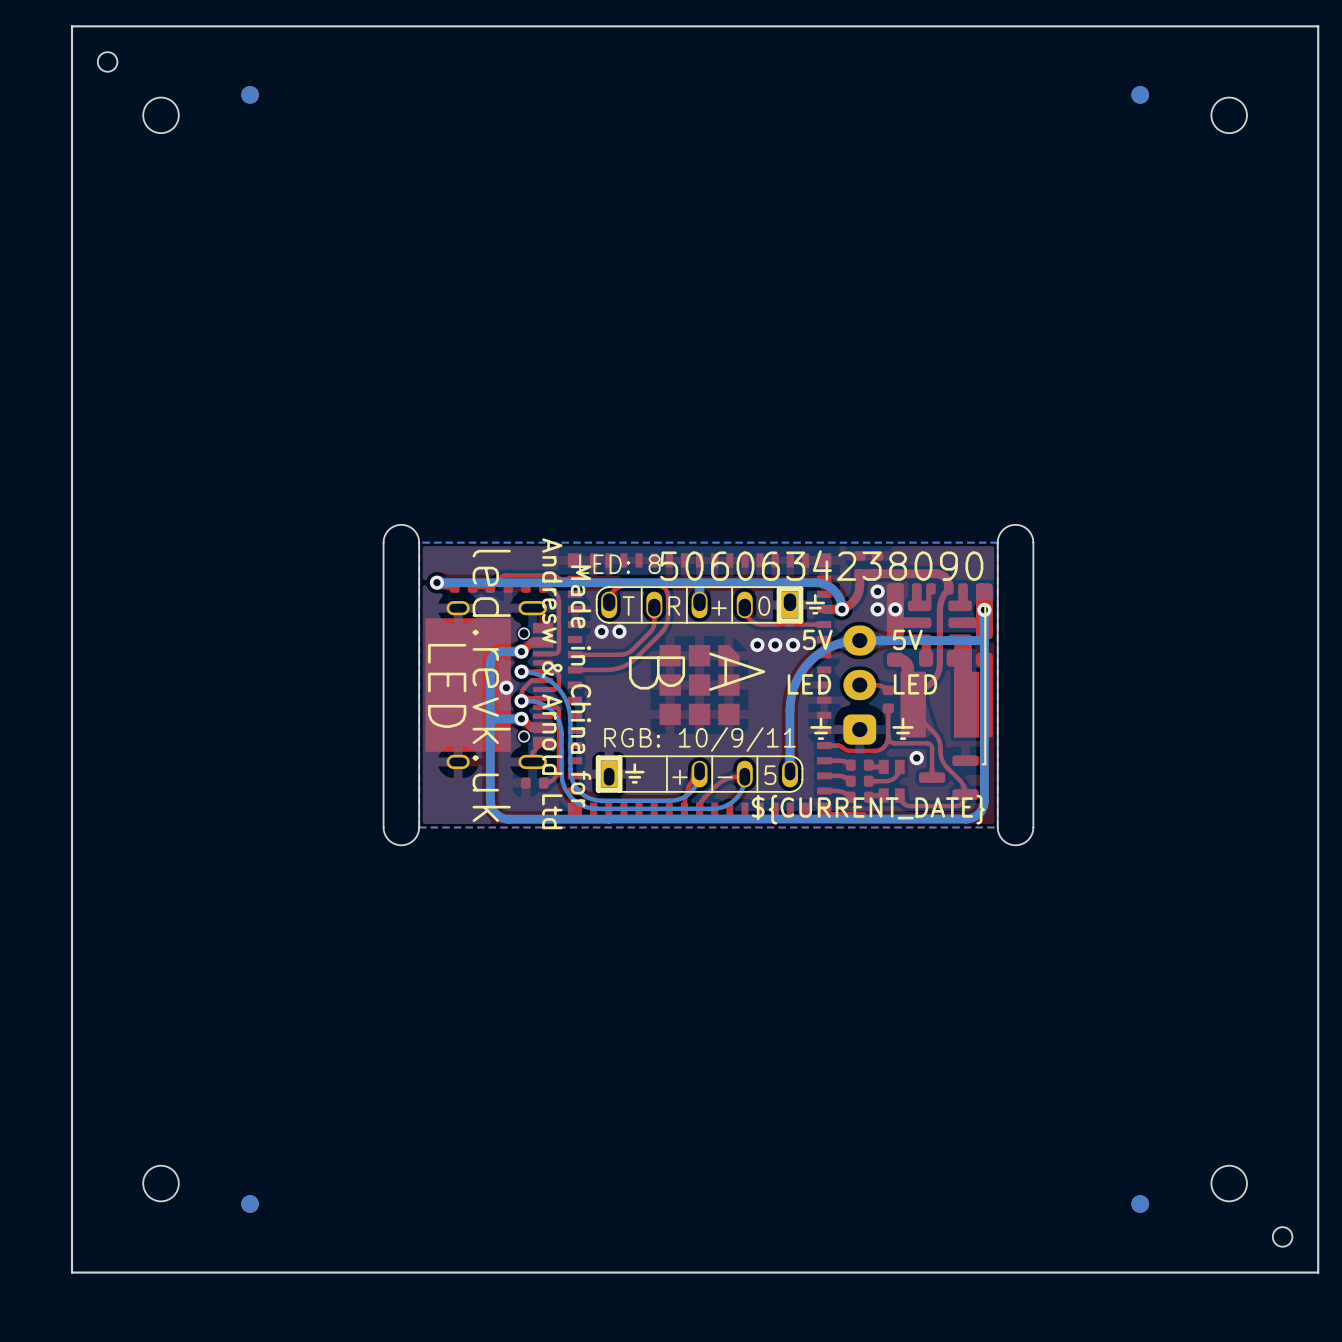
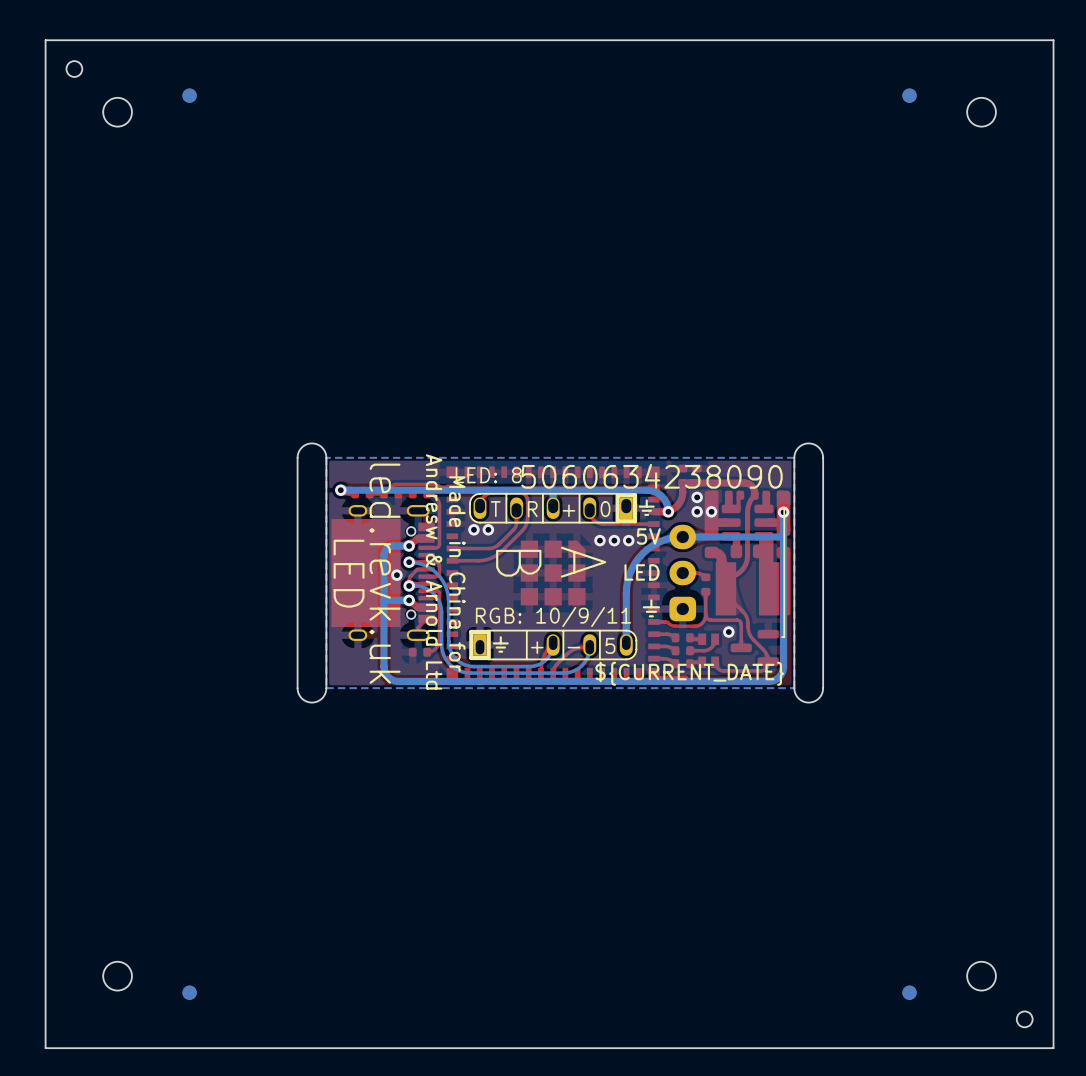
text: 5V (907, 639) -> none
text: LED (915, 684) -> none
text: ⏚ (903, 728) -> none

